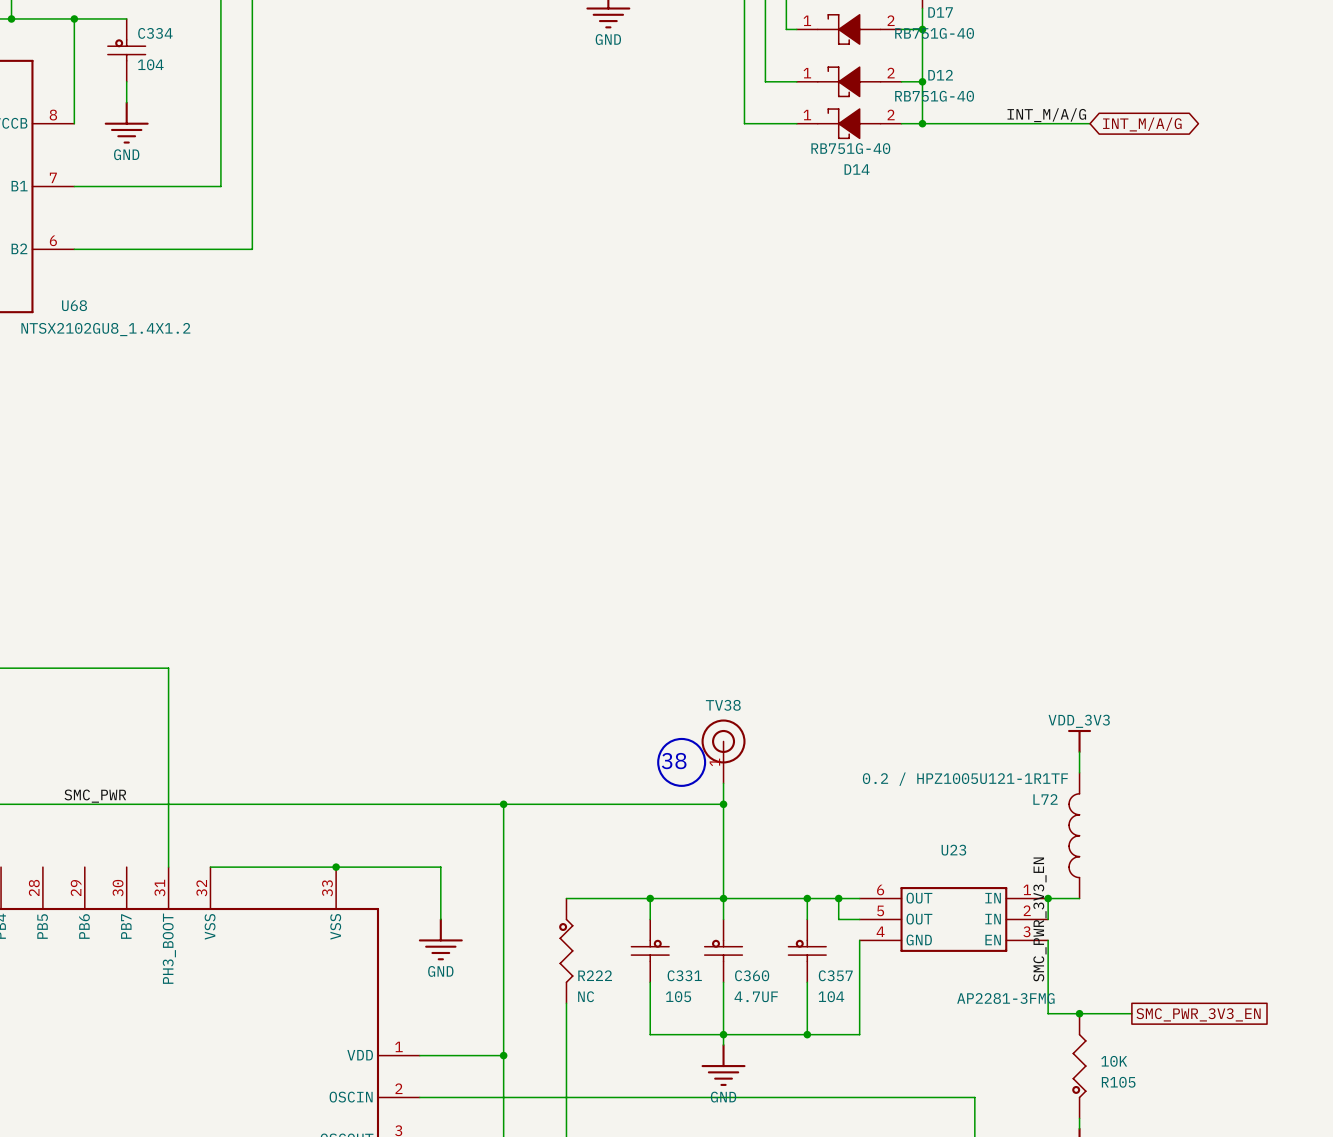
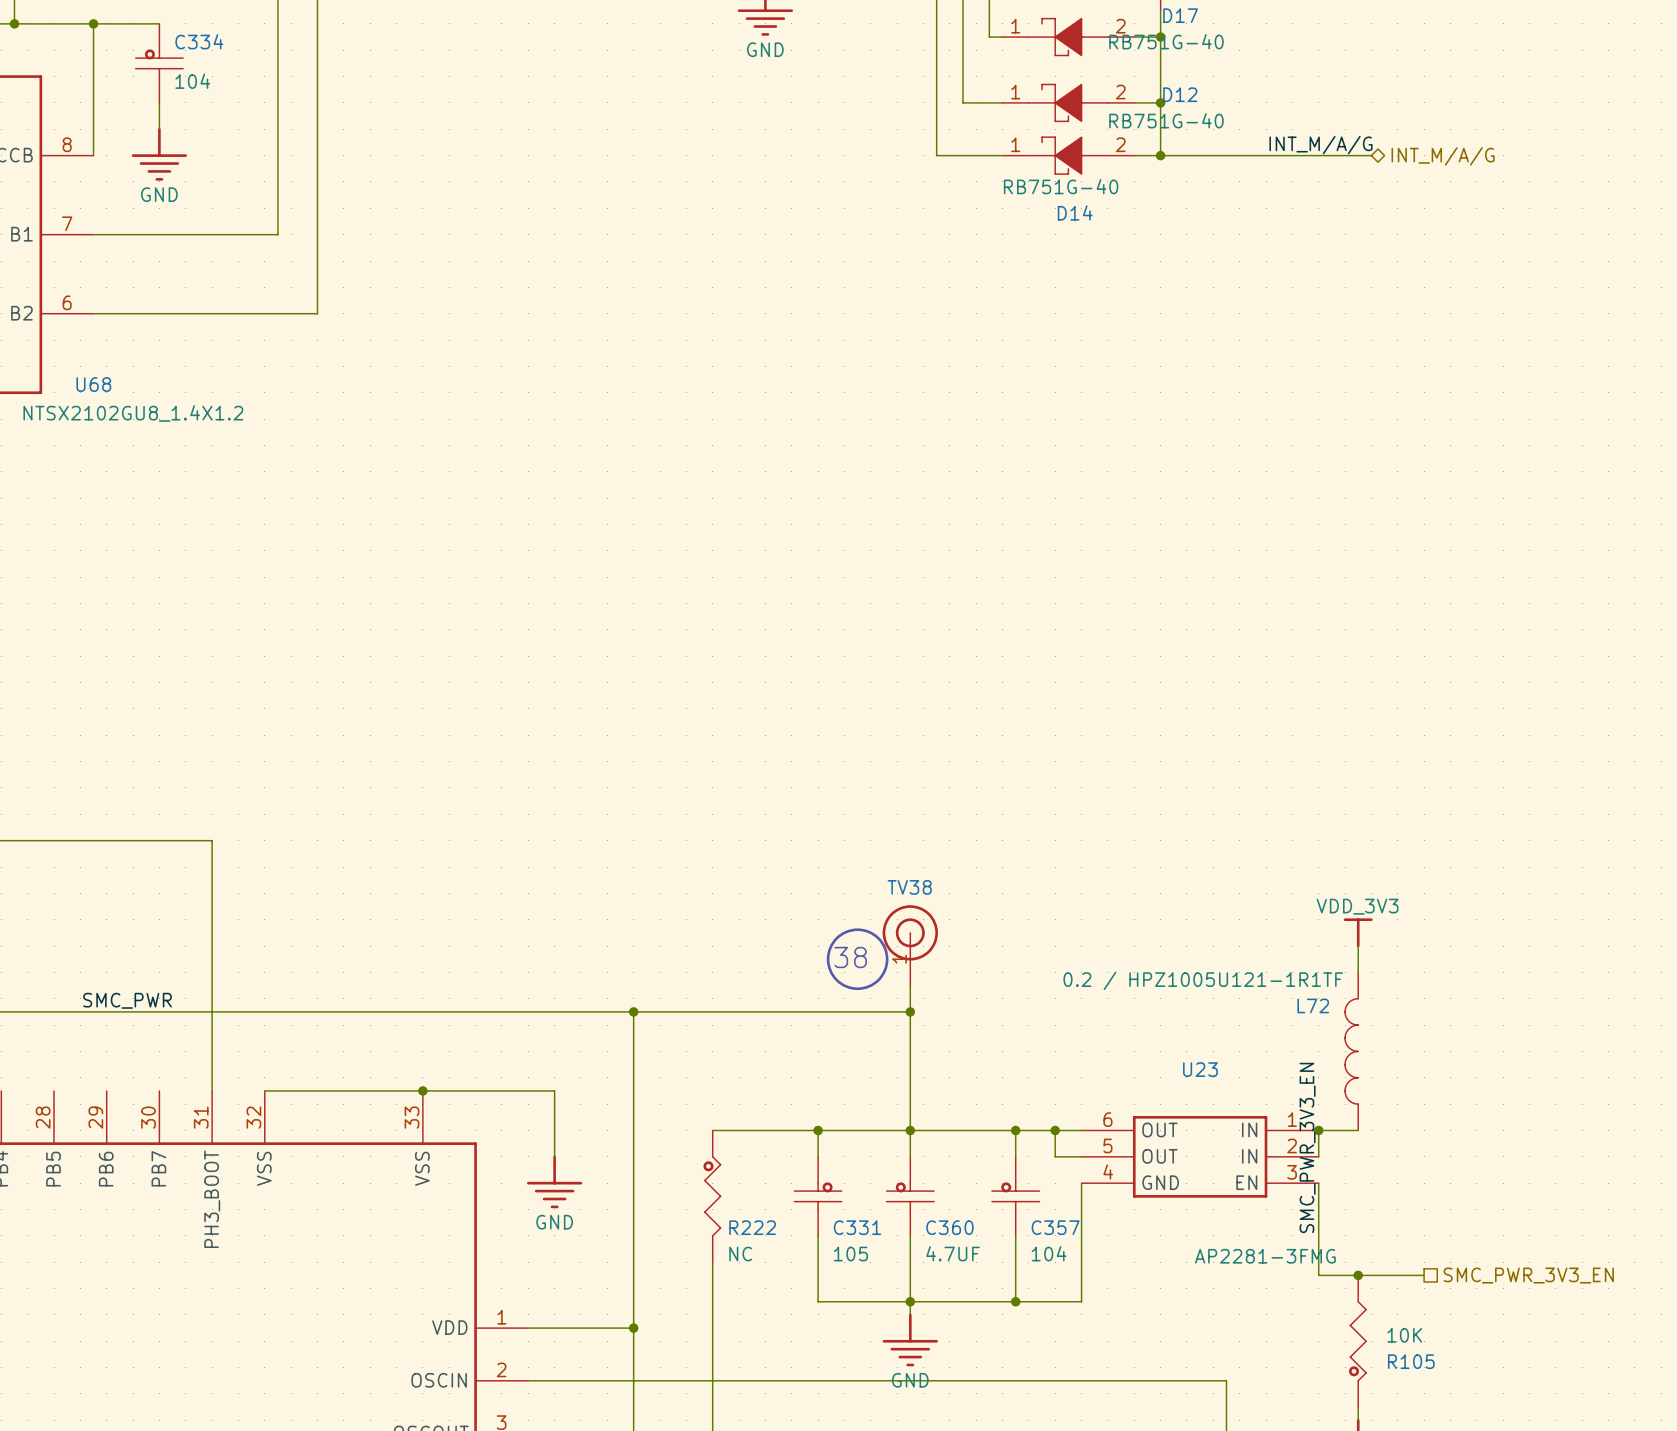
global label: INT_M/A/G (1142, 124) -> none
hierarchical label: none -> INT_M/A/G (1443, 156)
global label: SMC_PWR_3V3_EN (1198, 1014) -> none
hierarchical label: none -> SMC_PWR_3V3_EN (1528, 1275)

